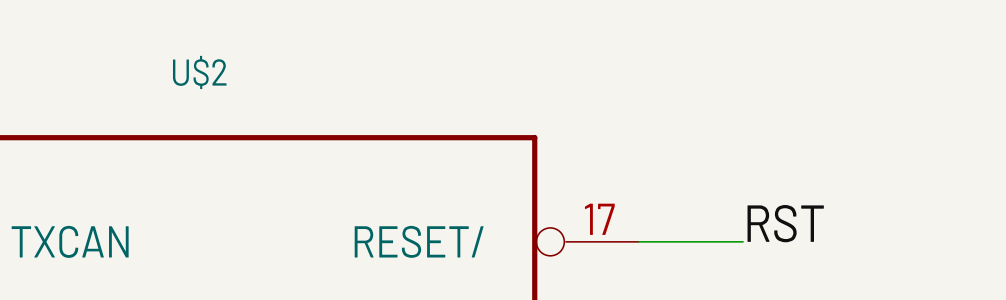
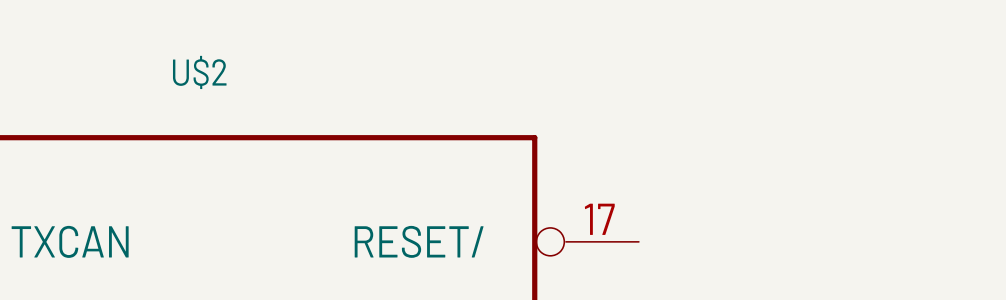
label: RST (785, 223) -> none
wire: (638, 241) (743, 241) -> none

